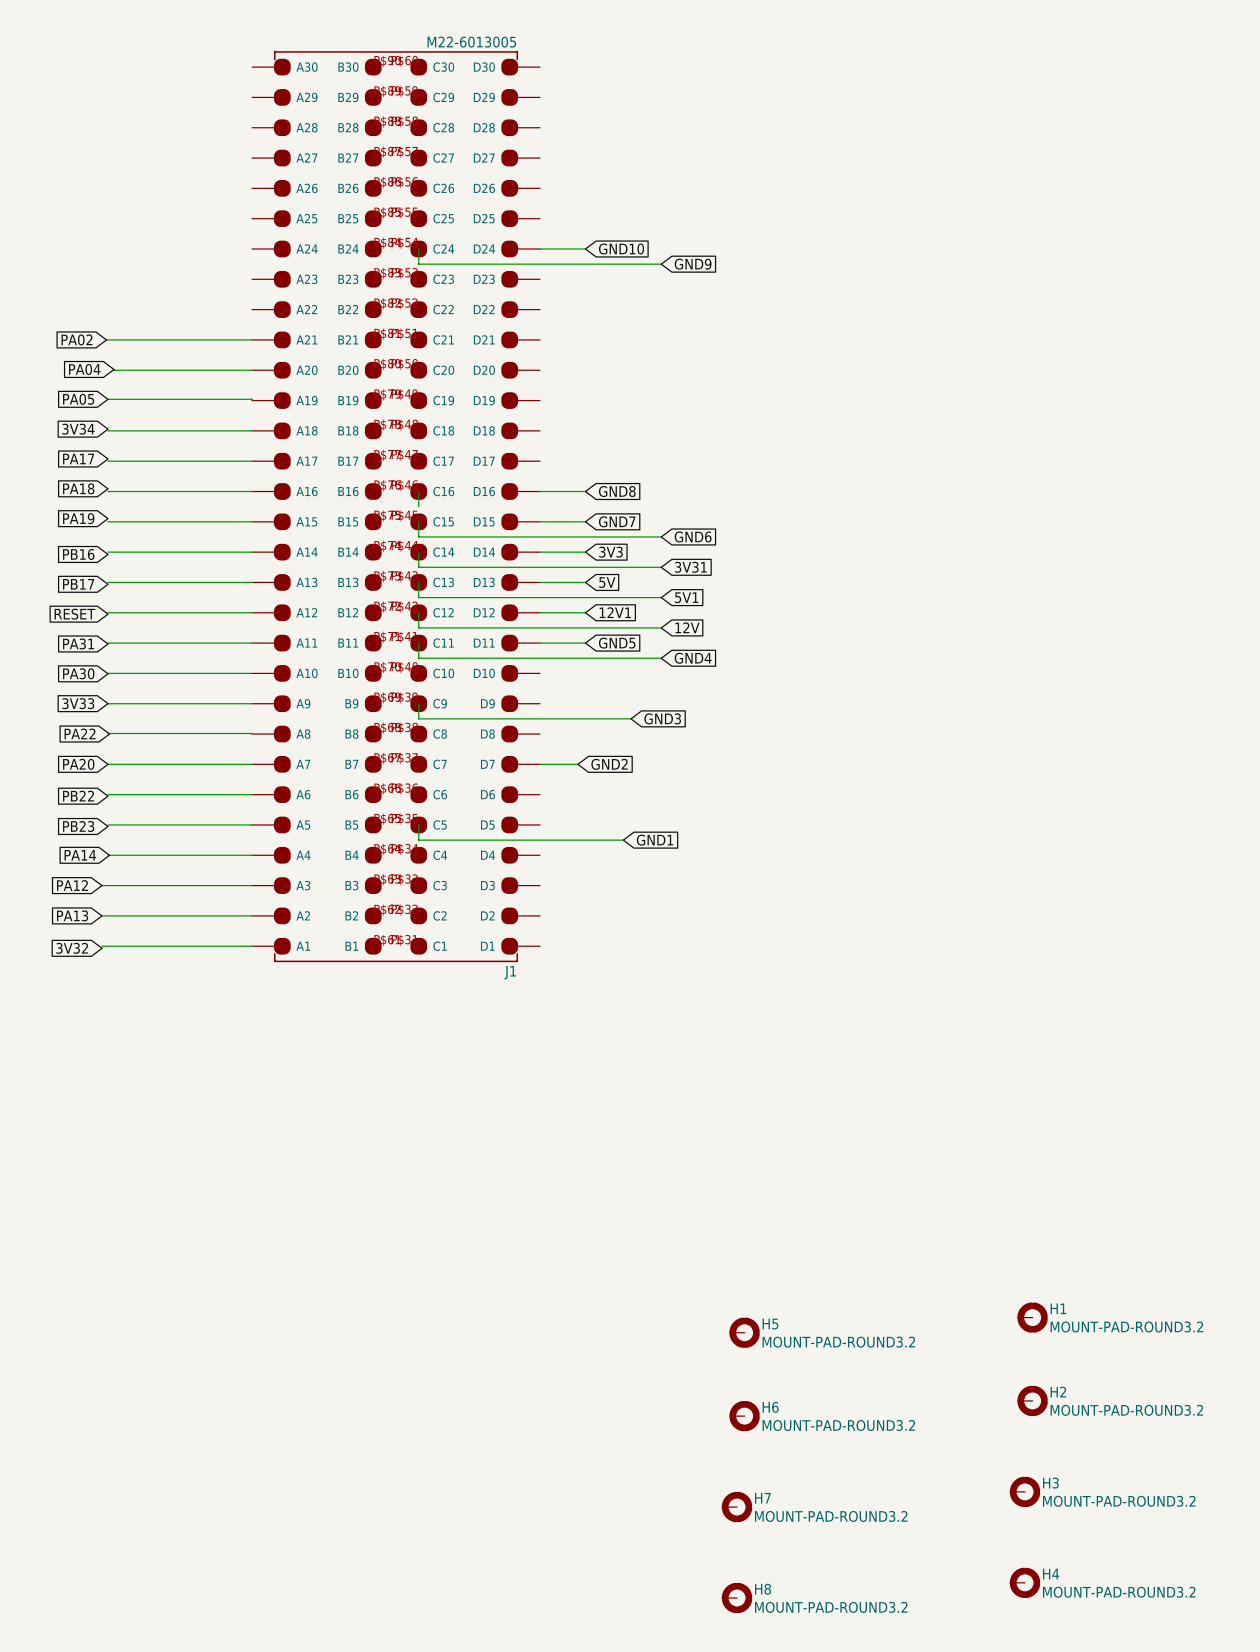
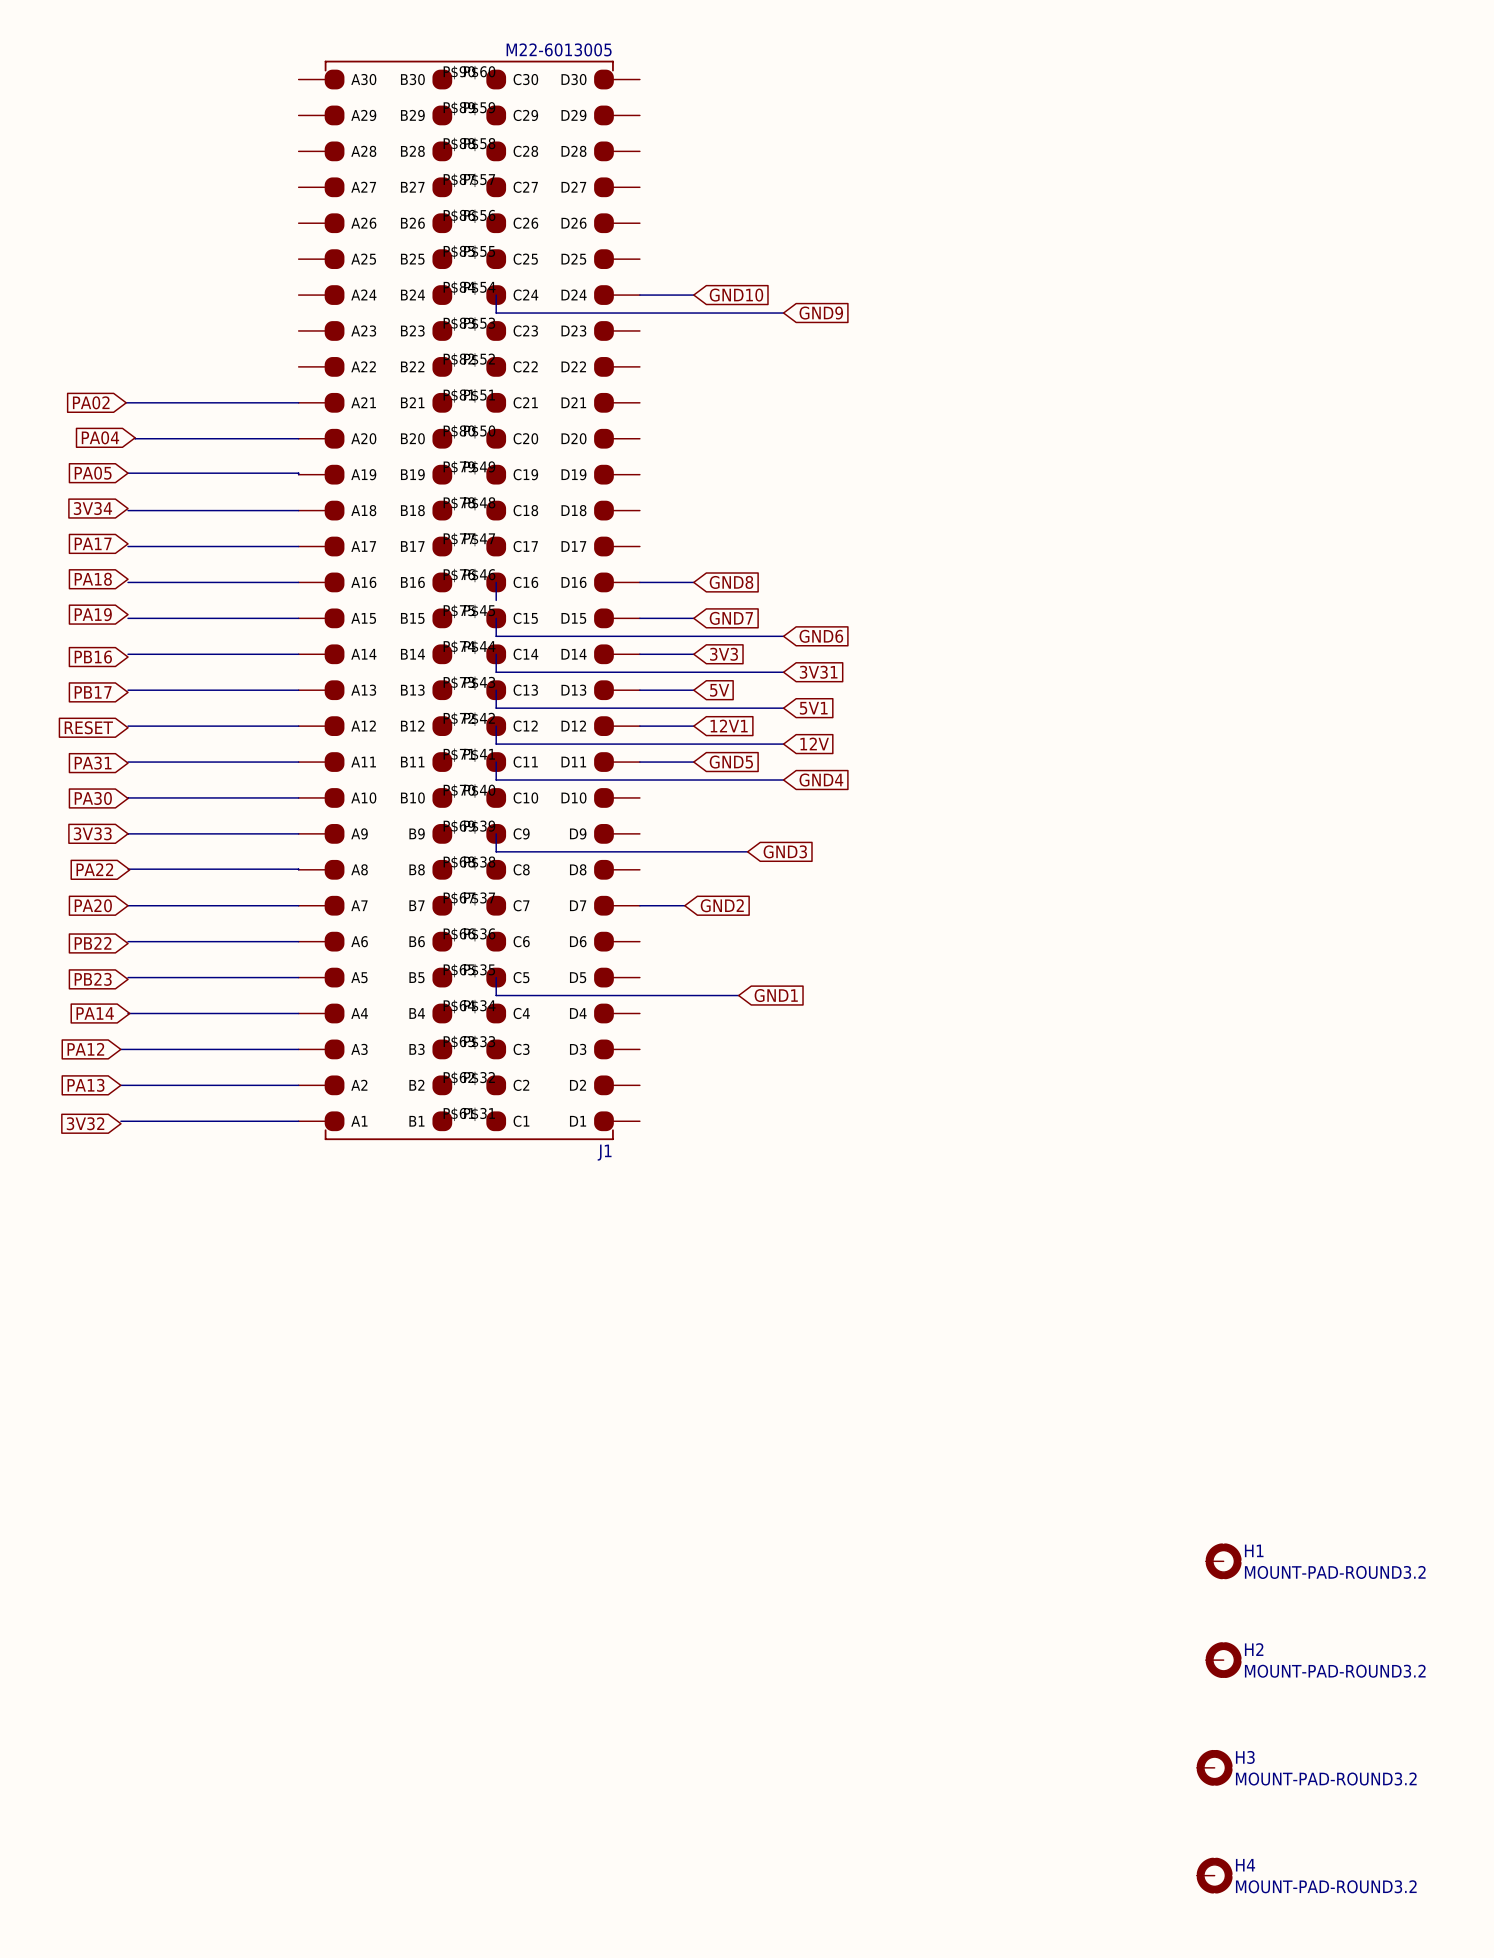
H5: MOUNT-PAD-ROUND3.2 (744, 1332) -> none
H6: MOUNT-PAD-ROUND3.2 (744, 1416) -> none
H7: MOUNT-PAD-ROUND3.2 (737, 1507) -> none
H8: MOUNT-PAD-ROUND3.2 (737, 1598) -> none

